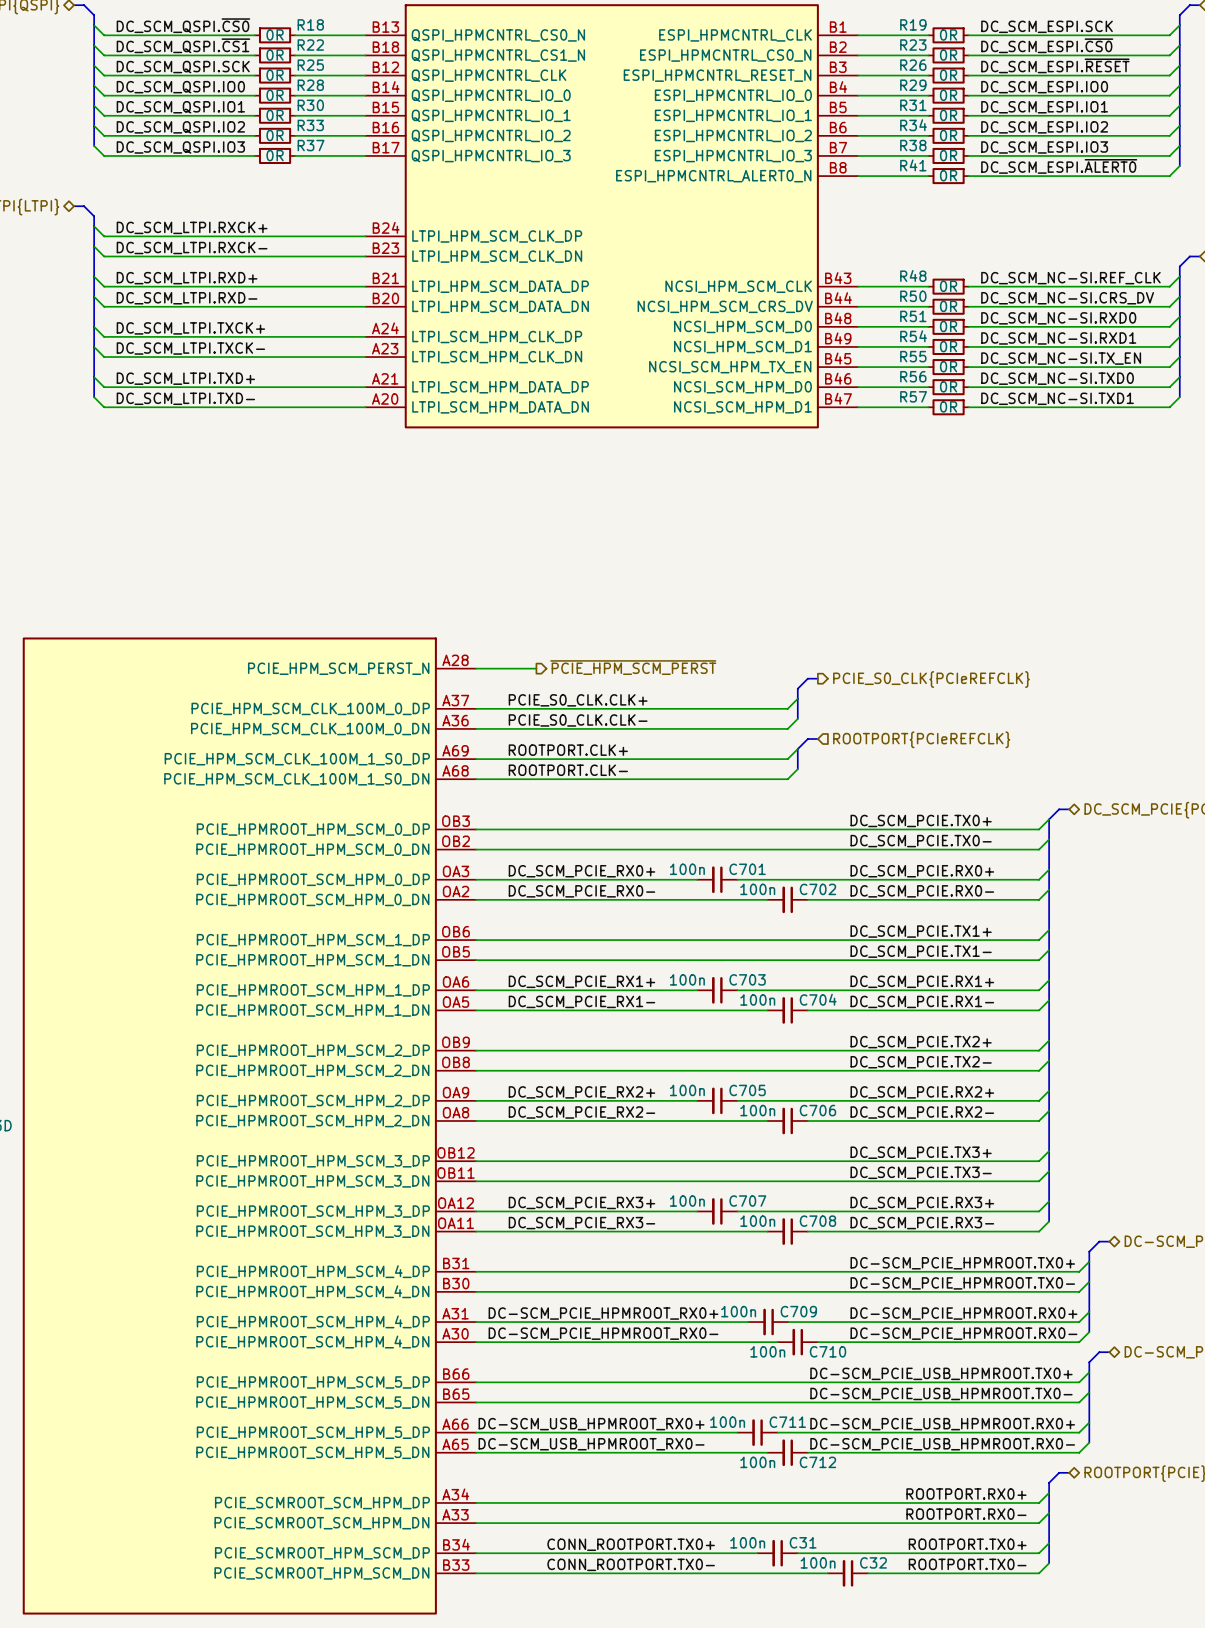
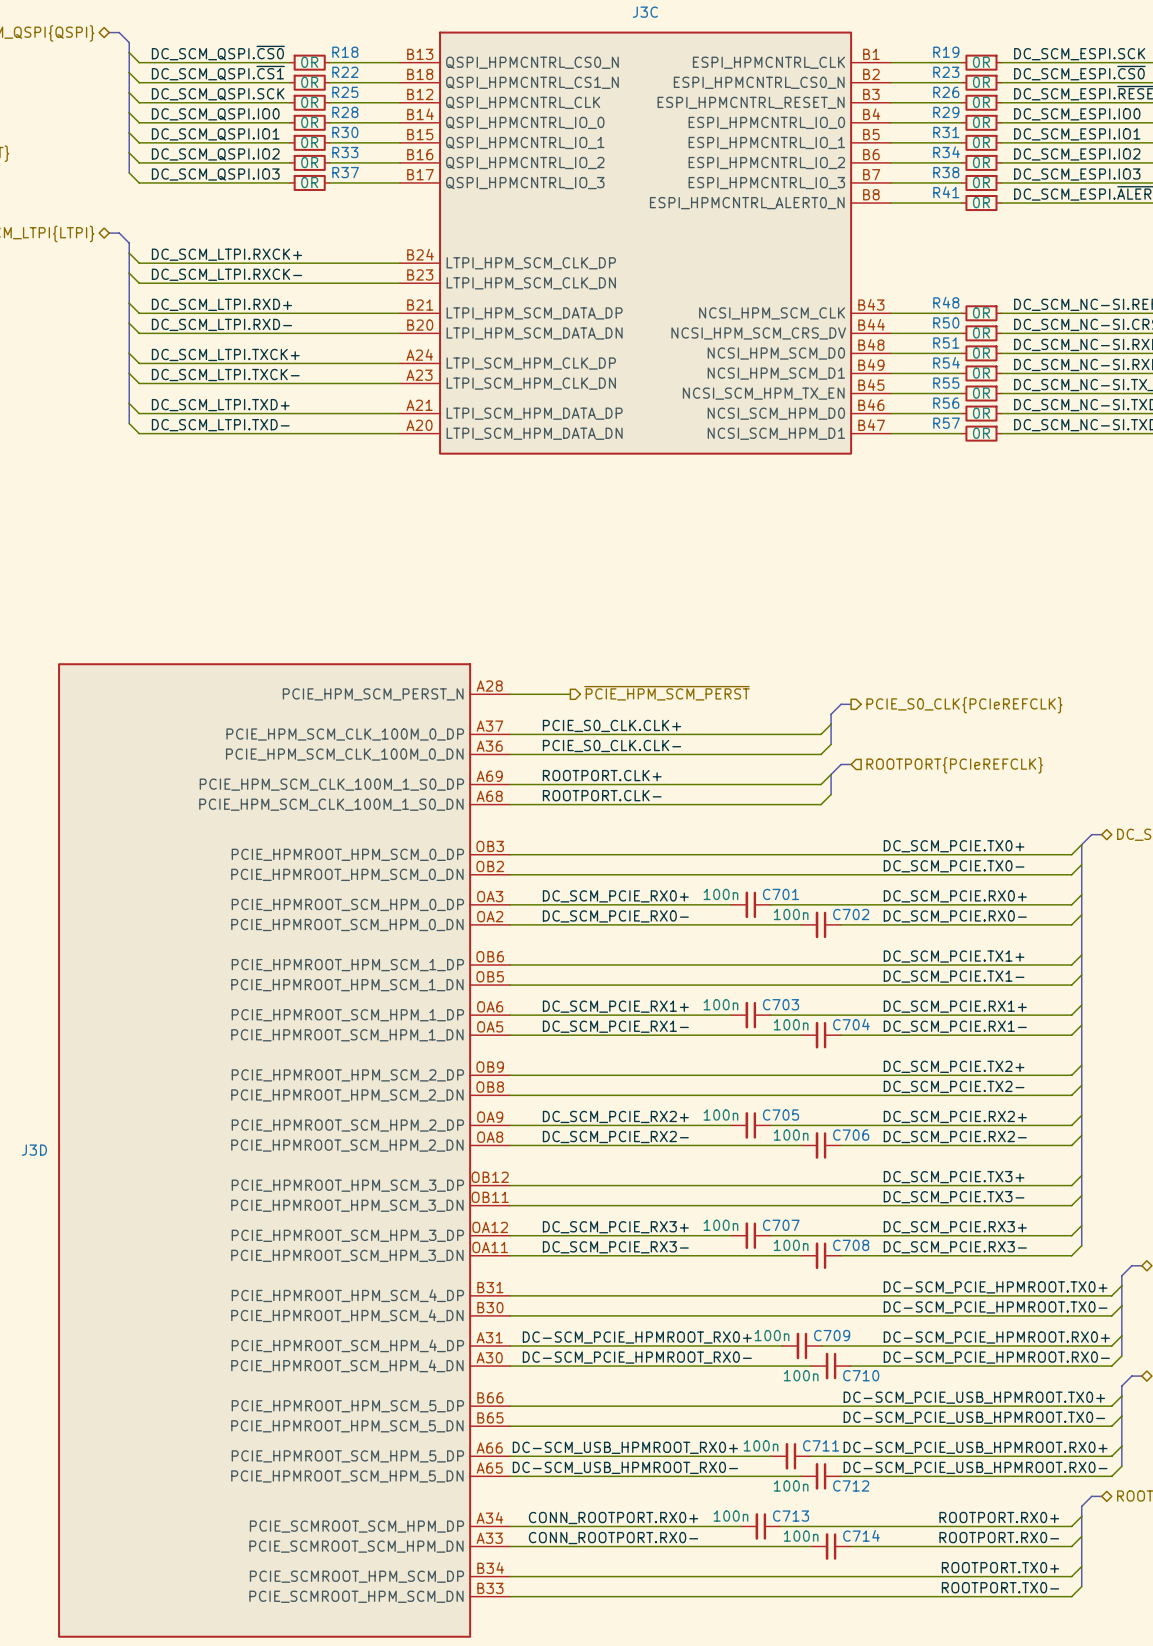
label: none -> CONN_ROOTPORT.RX0+ (613, 1517)
C713: none -> (760, 1526)
label: none -> CONN_ROOTPORT.RX0- (613, 1538)
C714: none -> (831, 1546)
label: CONN_ROOTPORT.TX0+ (631, 1544) -> none
C31: (777, 1553) -> none
label: CONN_ROOTPORT.TX0- (631, 1564) -> none
C32: (848, 1573) -> none

